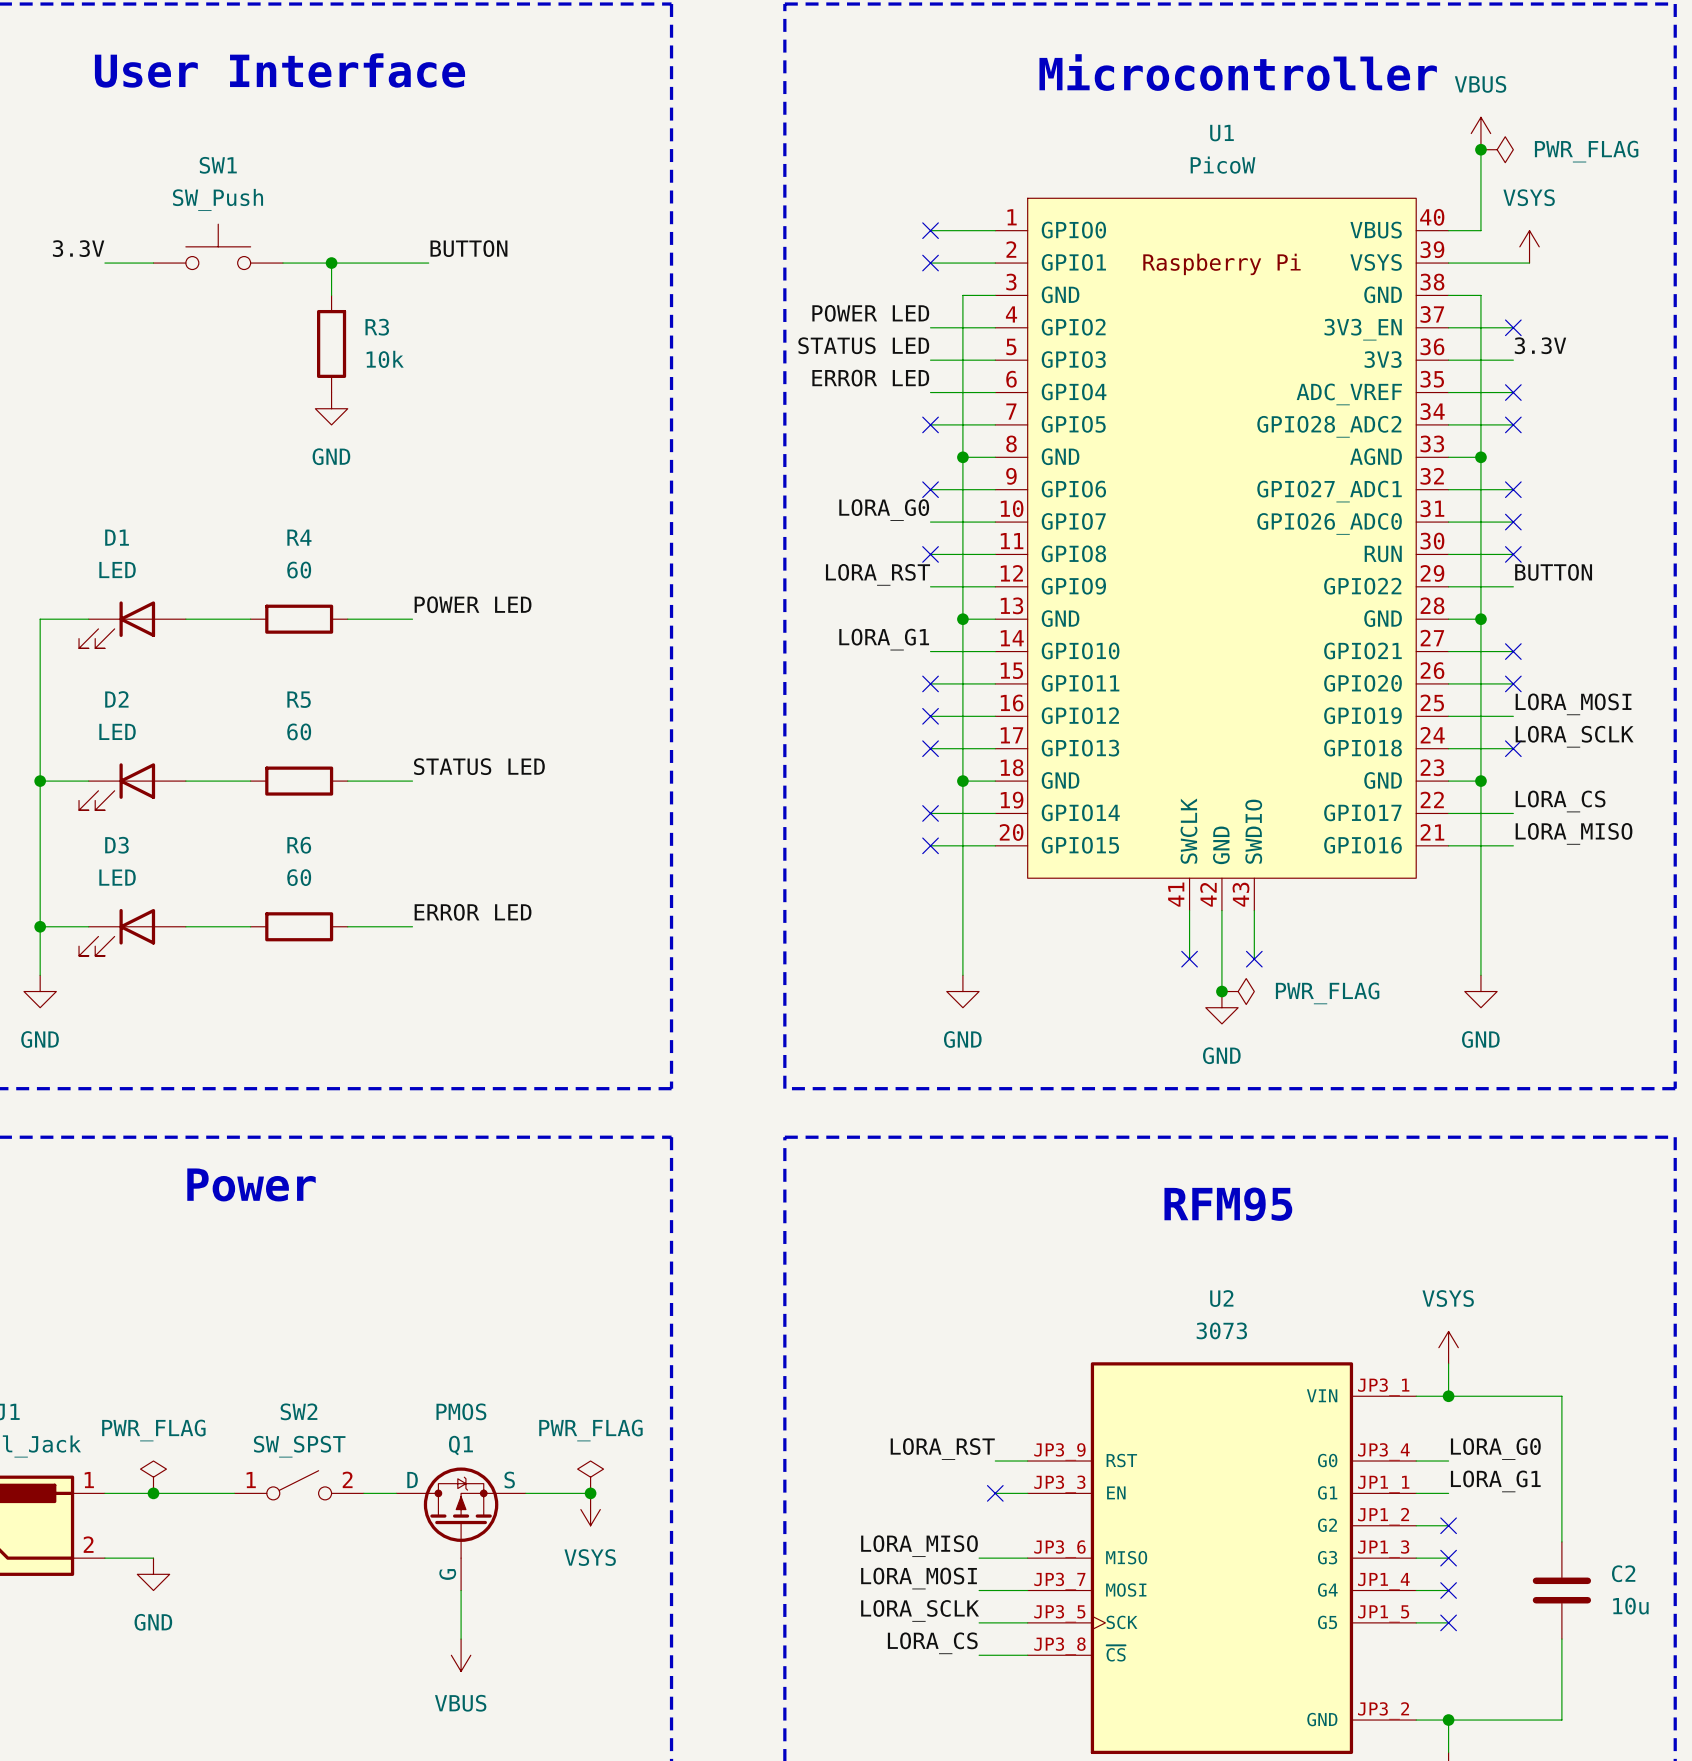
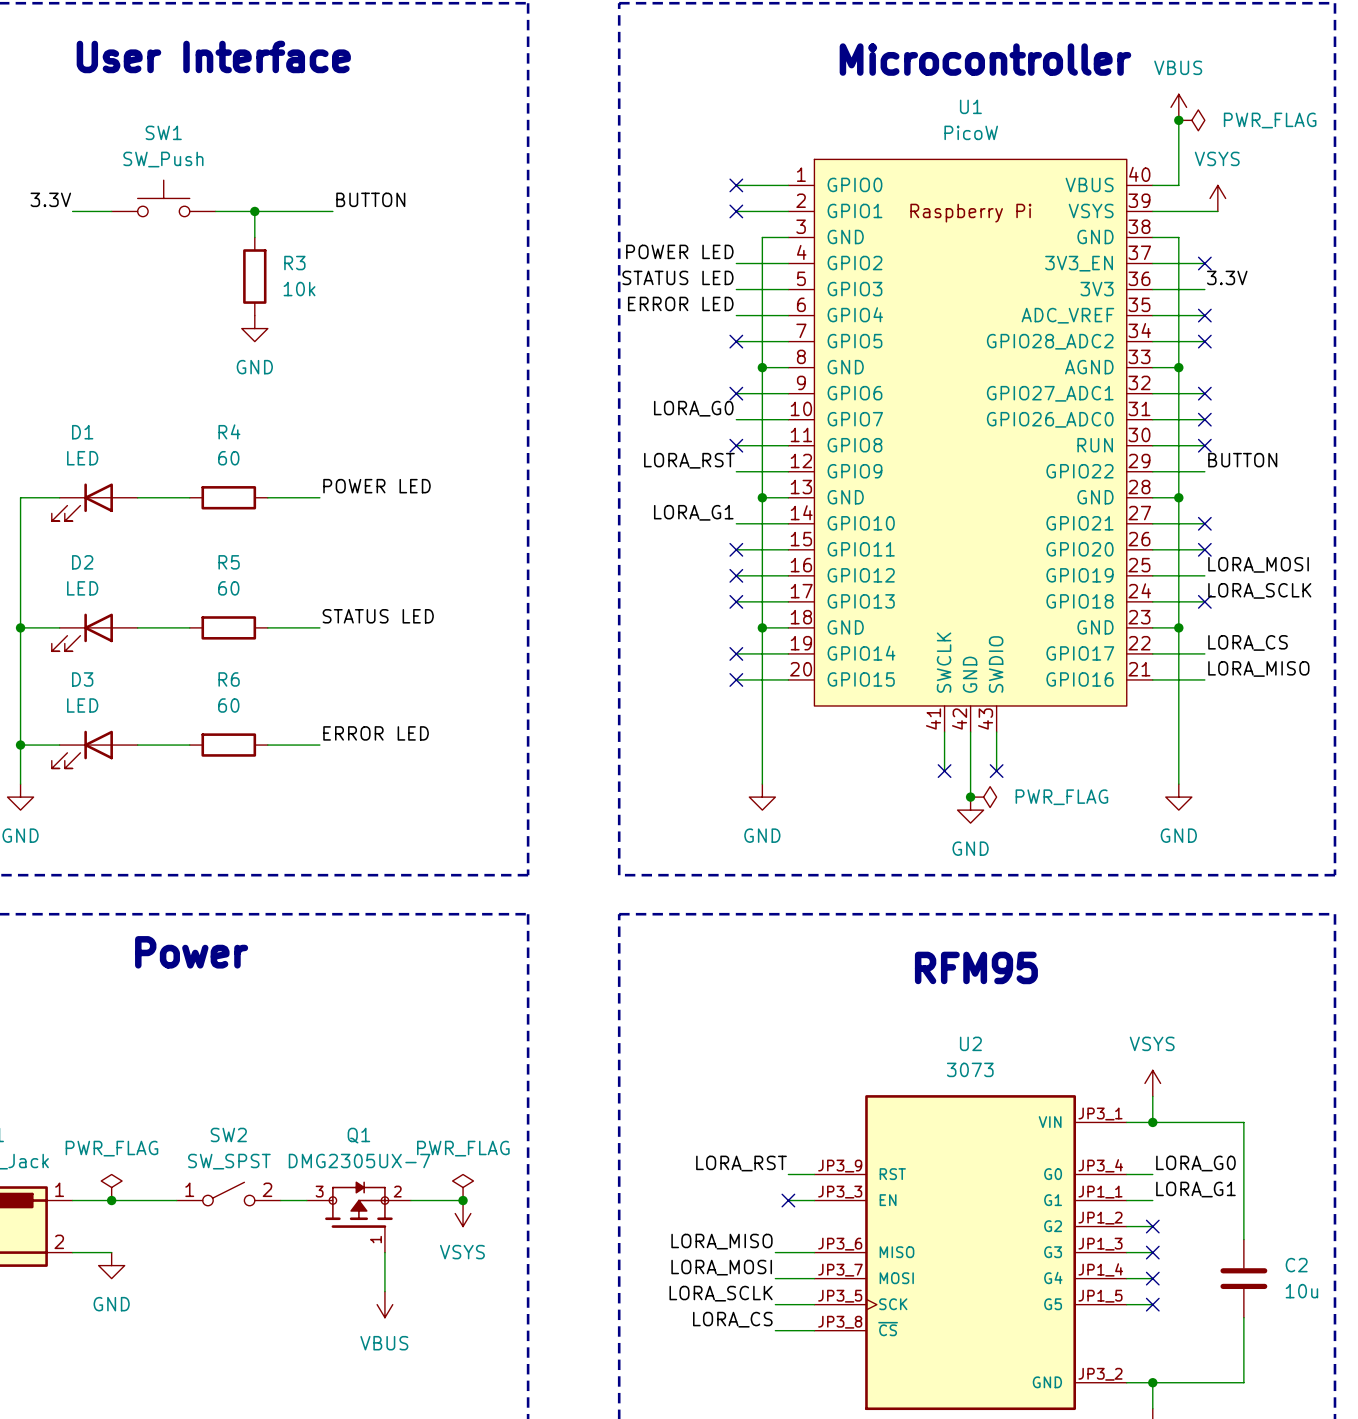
Q1 value: PMOS (461, 1411) -> DMG2305UX-7 (359, 1161)
Q1 symbol: [396, 1467, 526, 1591] -> [306, 1181, 411, 1253]
wire: (461, 1590) (461, 1639) -> (384, 1252) (384, 1291)
power symbol position: VBUS (461, 1655) -> VBUS (384, 1304)

